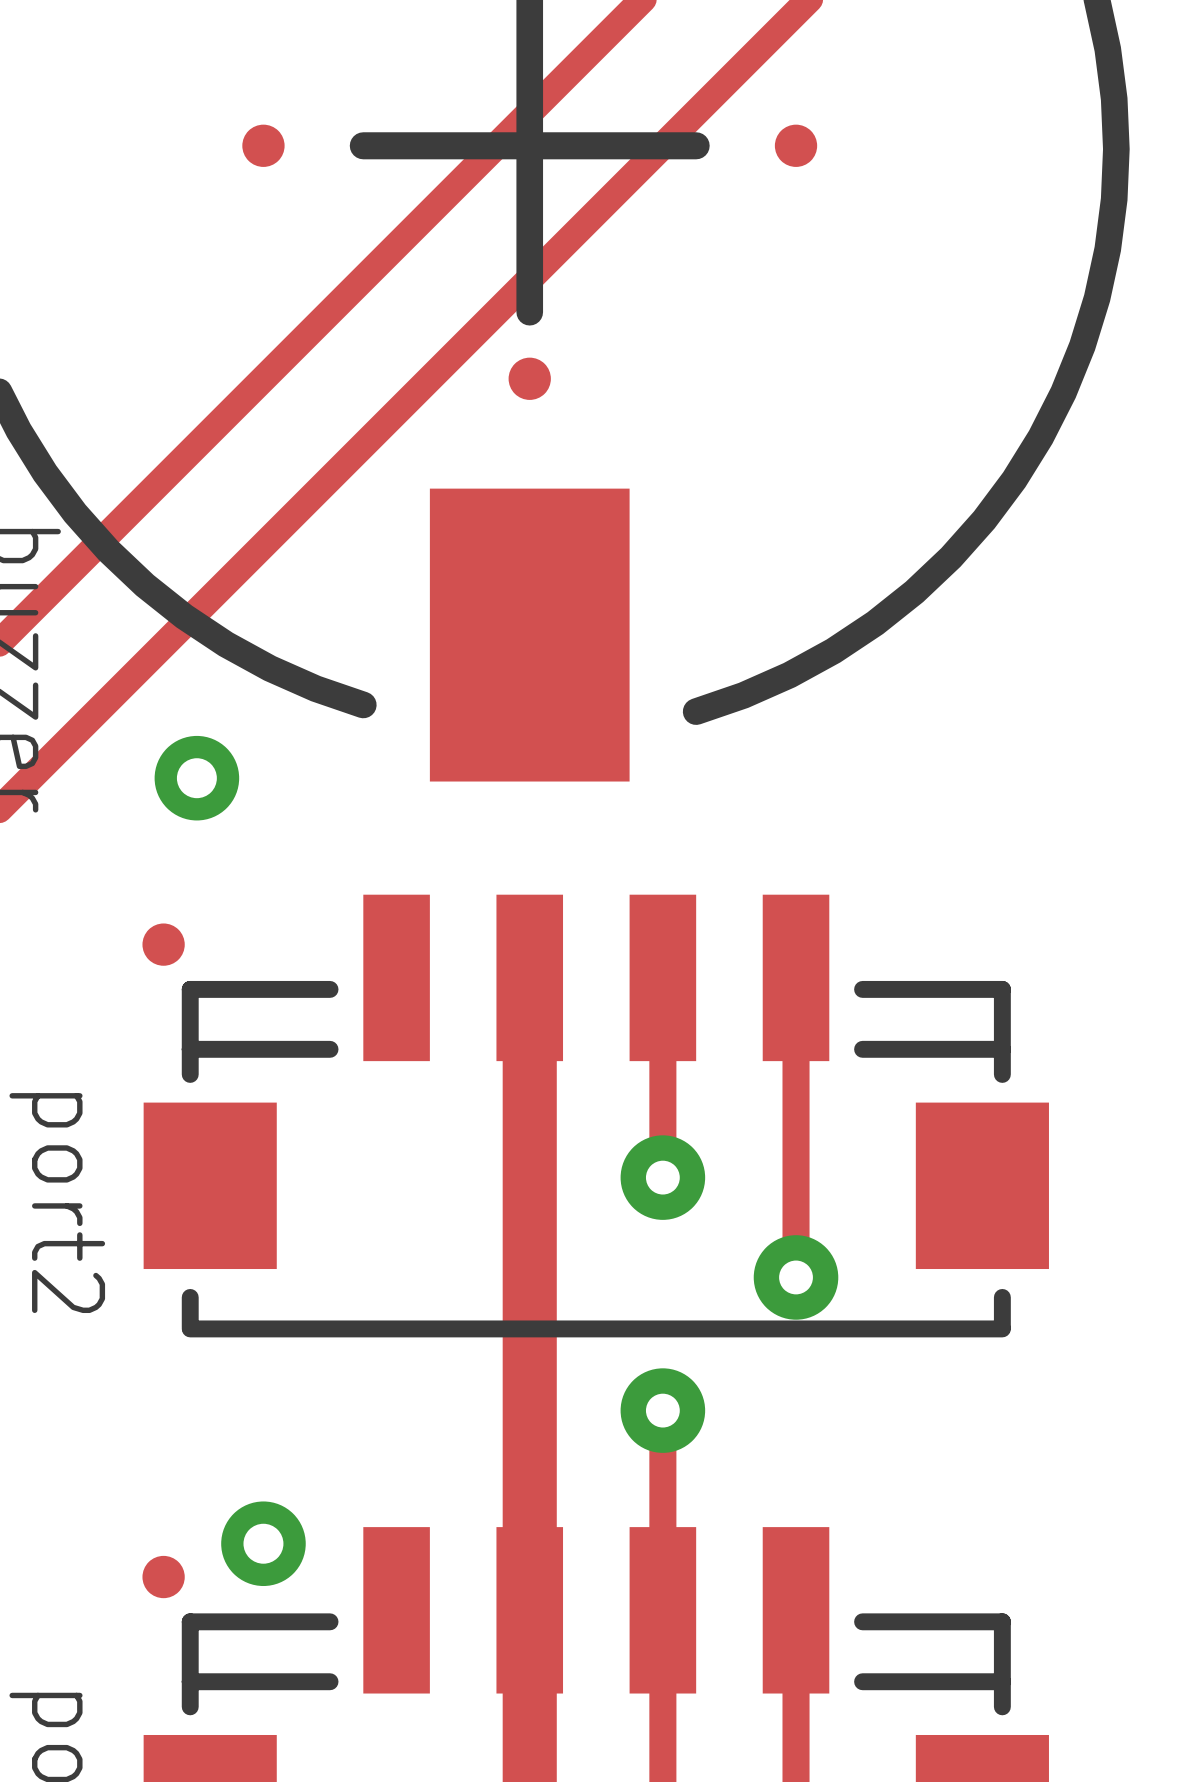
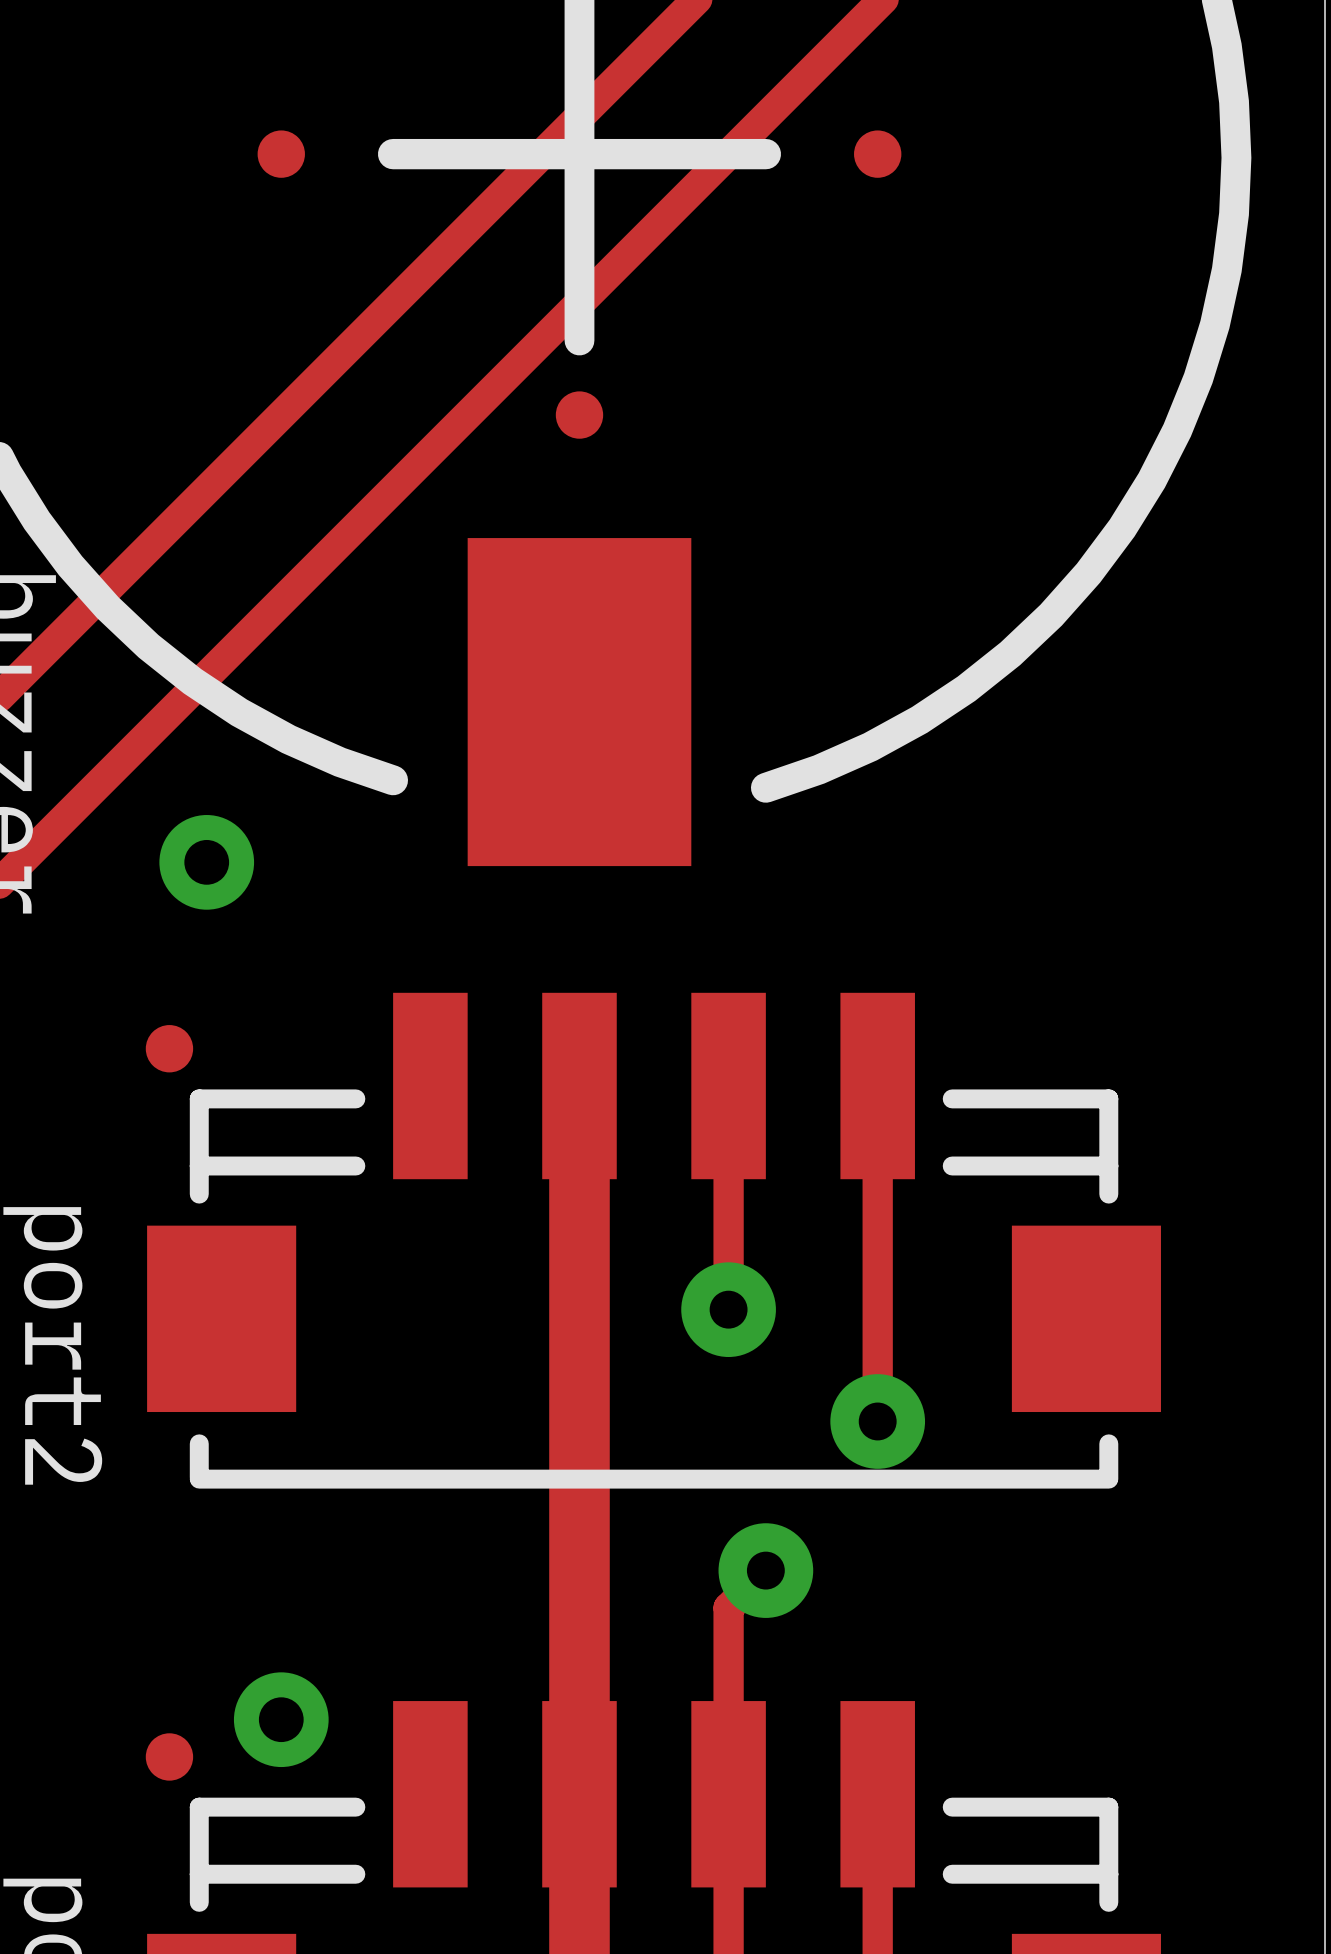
via position: (662, 1410) -> (765, 1570)

